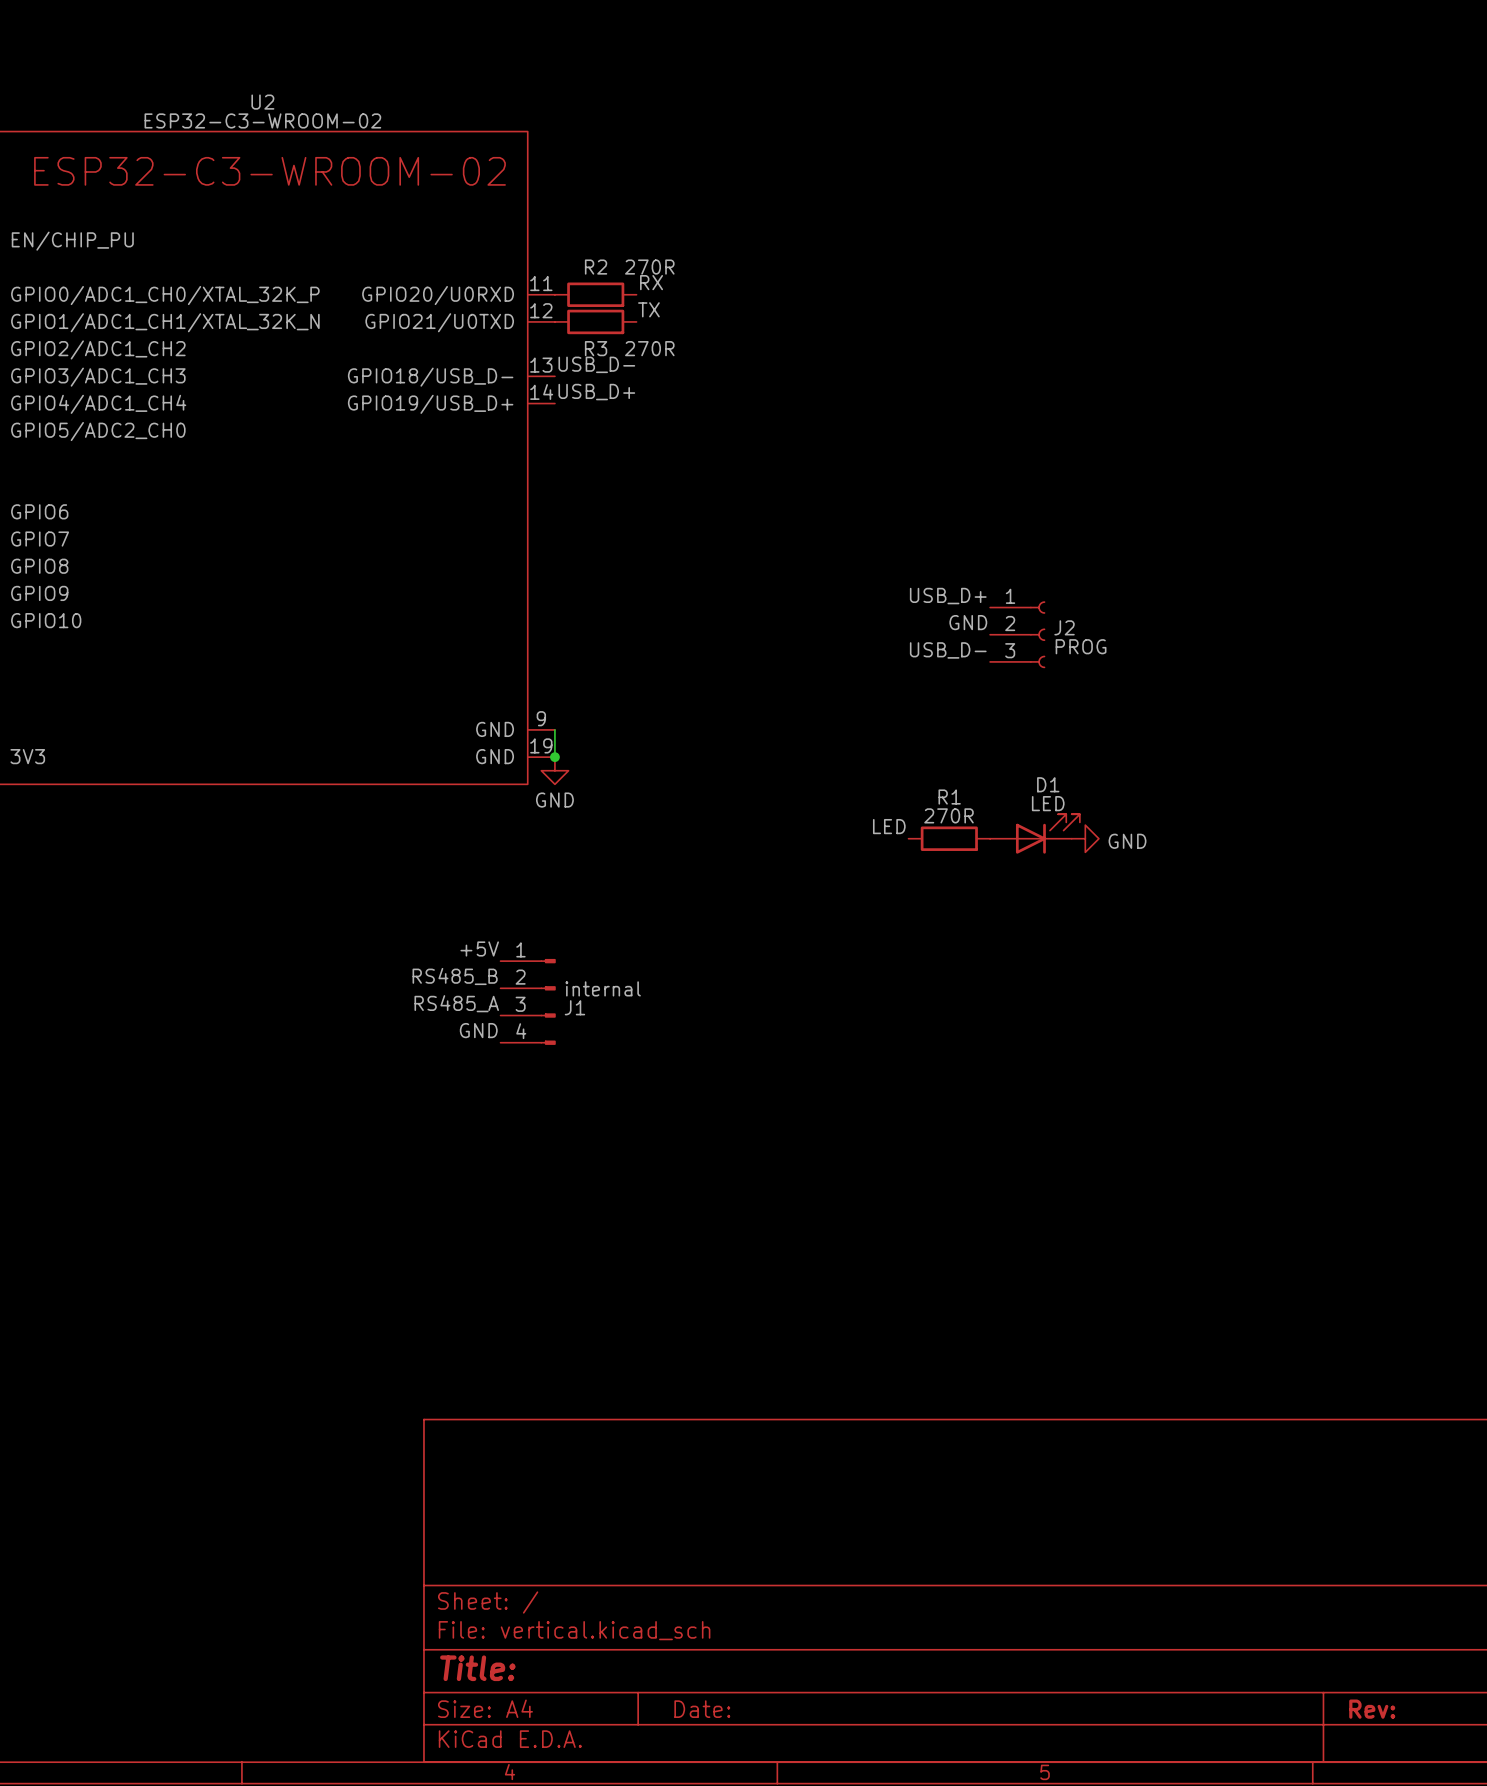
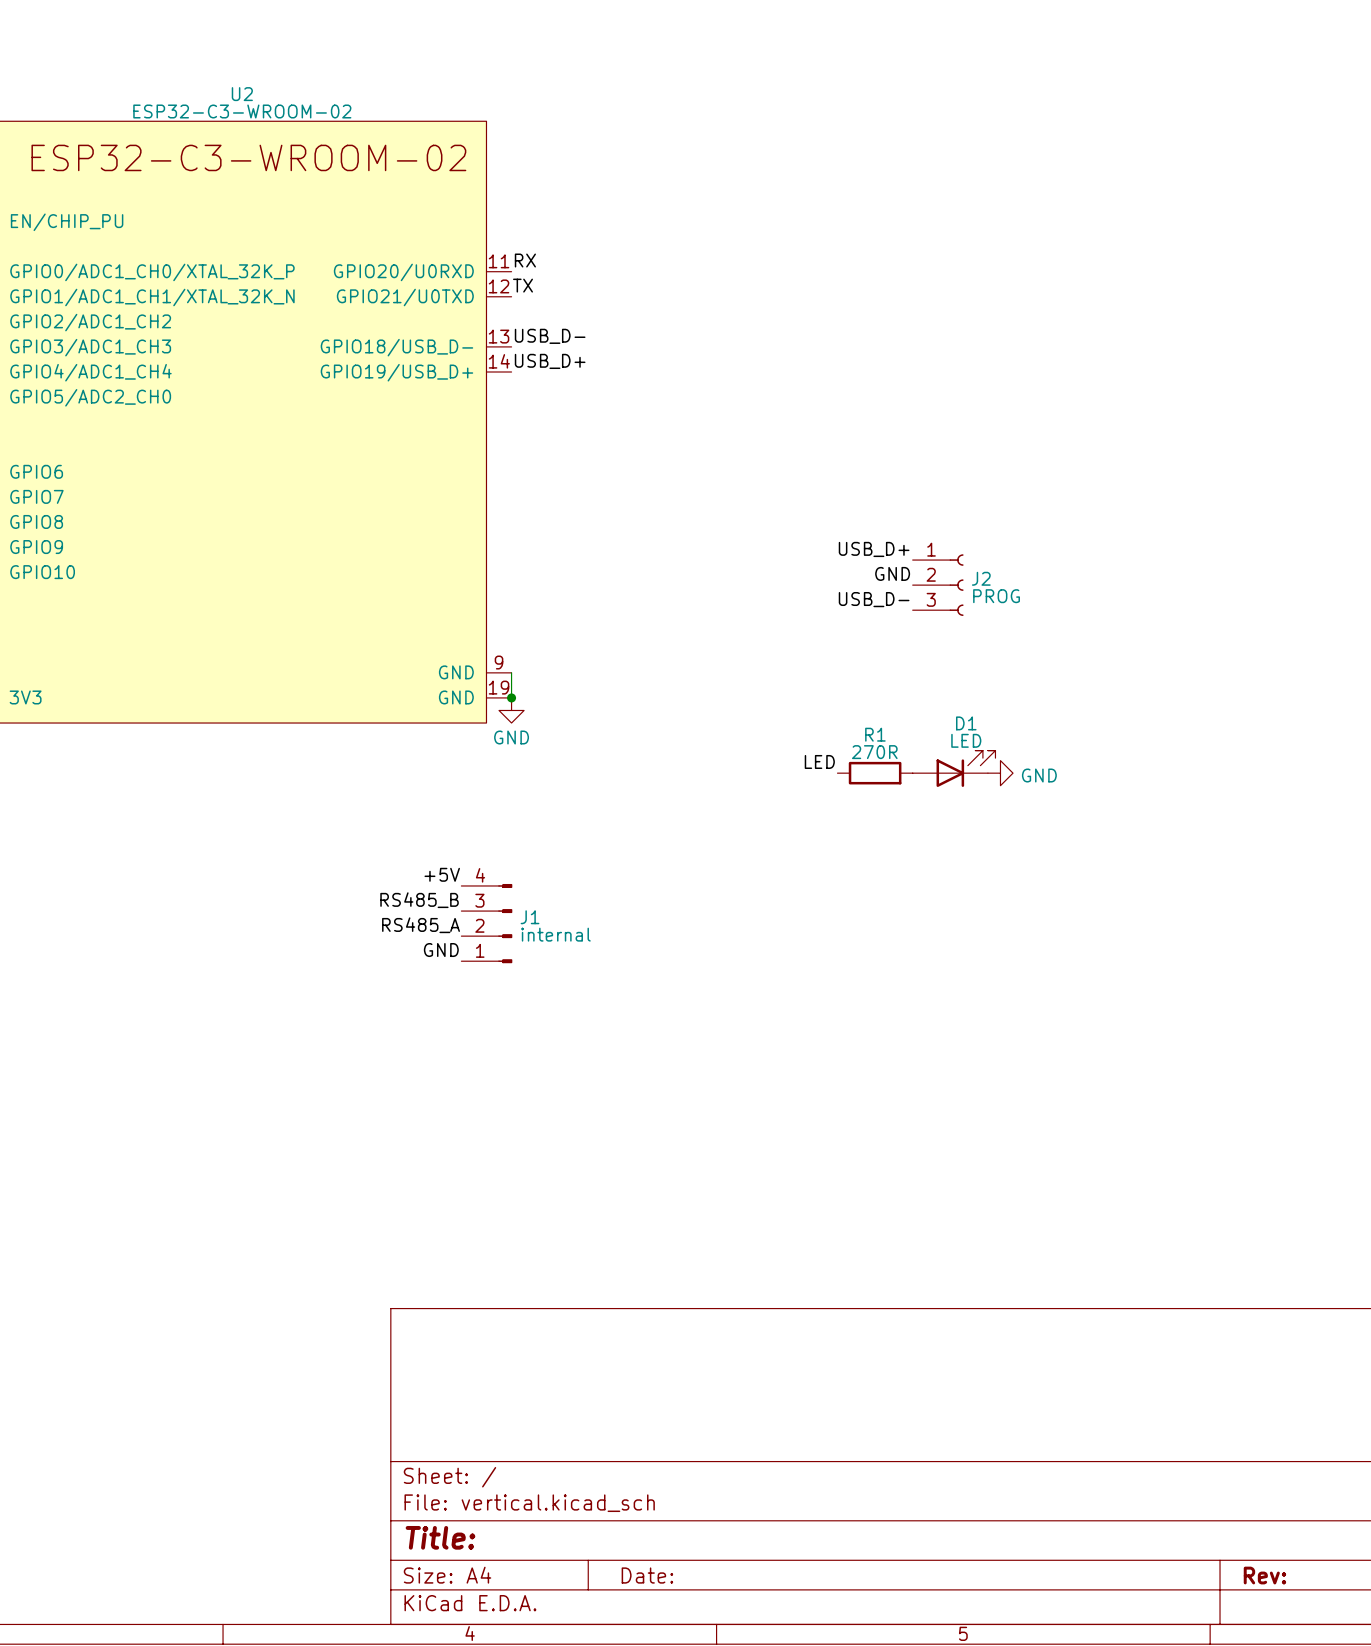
label position: RX (651, 282) -> RX (525, 260)
R2: 270R (595, 294) -> none
label position: TX (648, 309) -> TX (522, 285)
R3: 270R (595, 321) -> none
J1 flip: as is (548, 1001) -> up-down (505, 923)

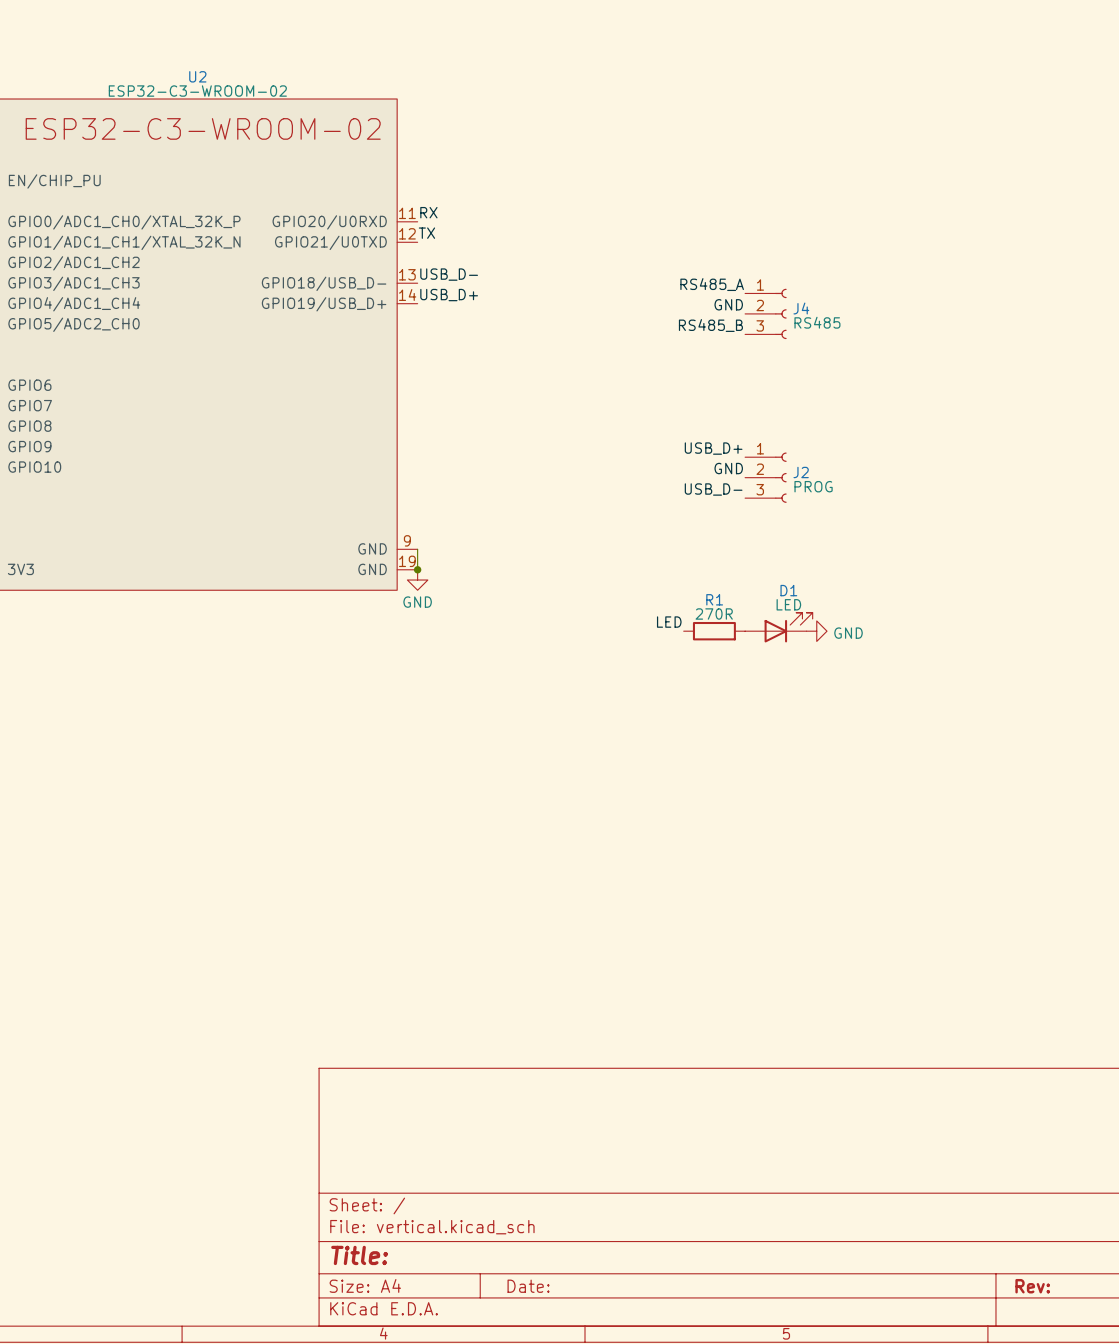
label: none -> RS485_A (712, 284)
label: none -> GND (728, 304)
J4: none -> RS485 (765, 313)
label: none -> RS485_B (710, 325)
label: +5V (442, 874) -> none
label: RS485_B (419, 900) -> none
J1: internal (486, 923) -> none
label: RS485_A (421, 925) -> none
label: GND (441, 950) -> none

